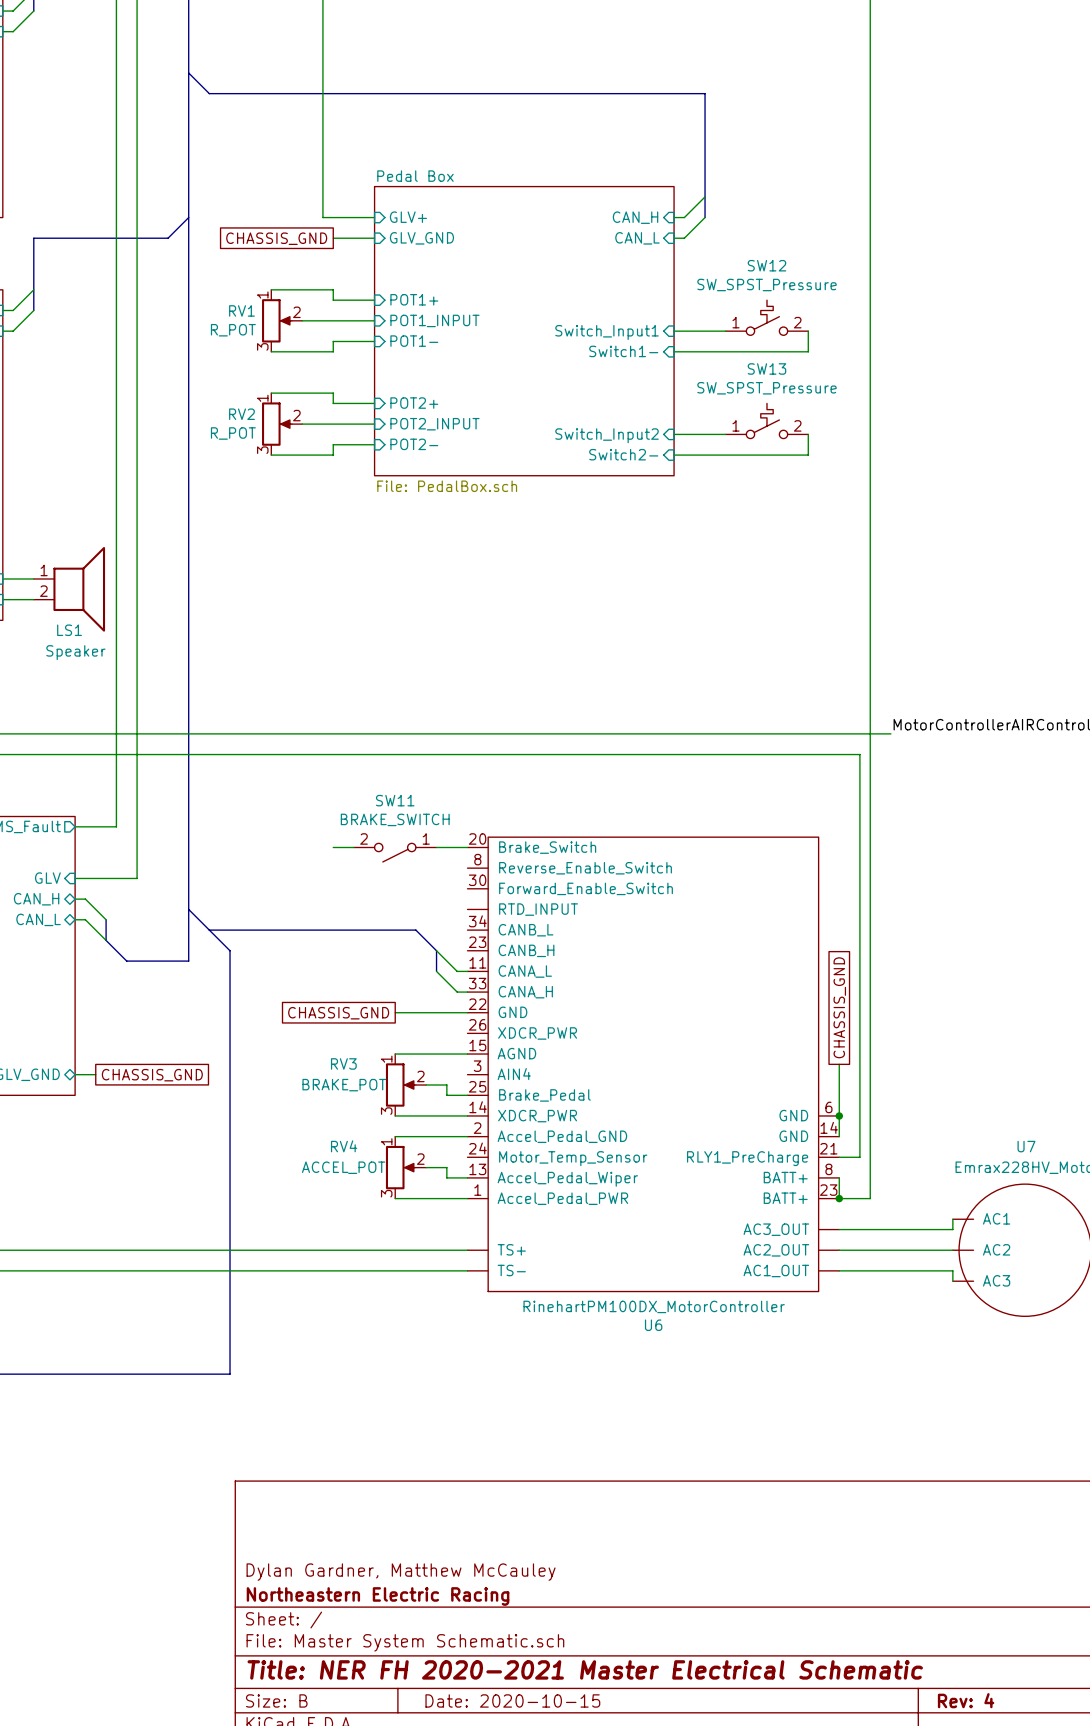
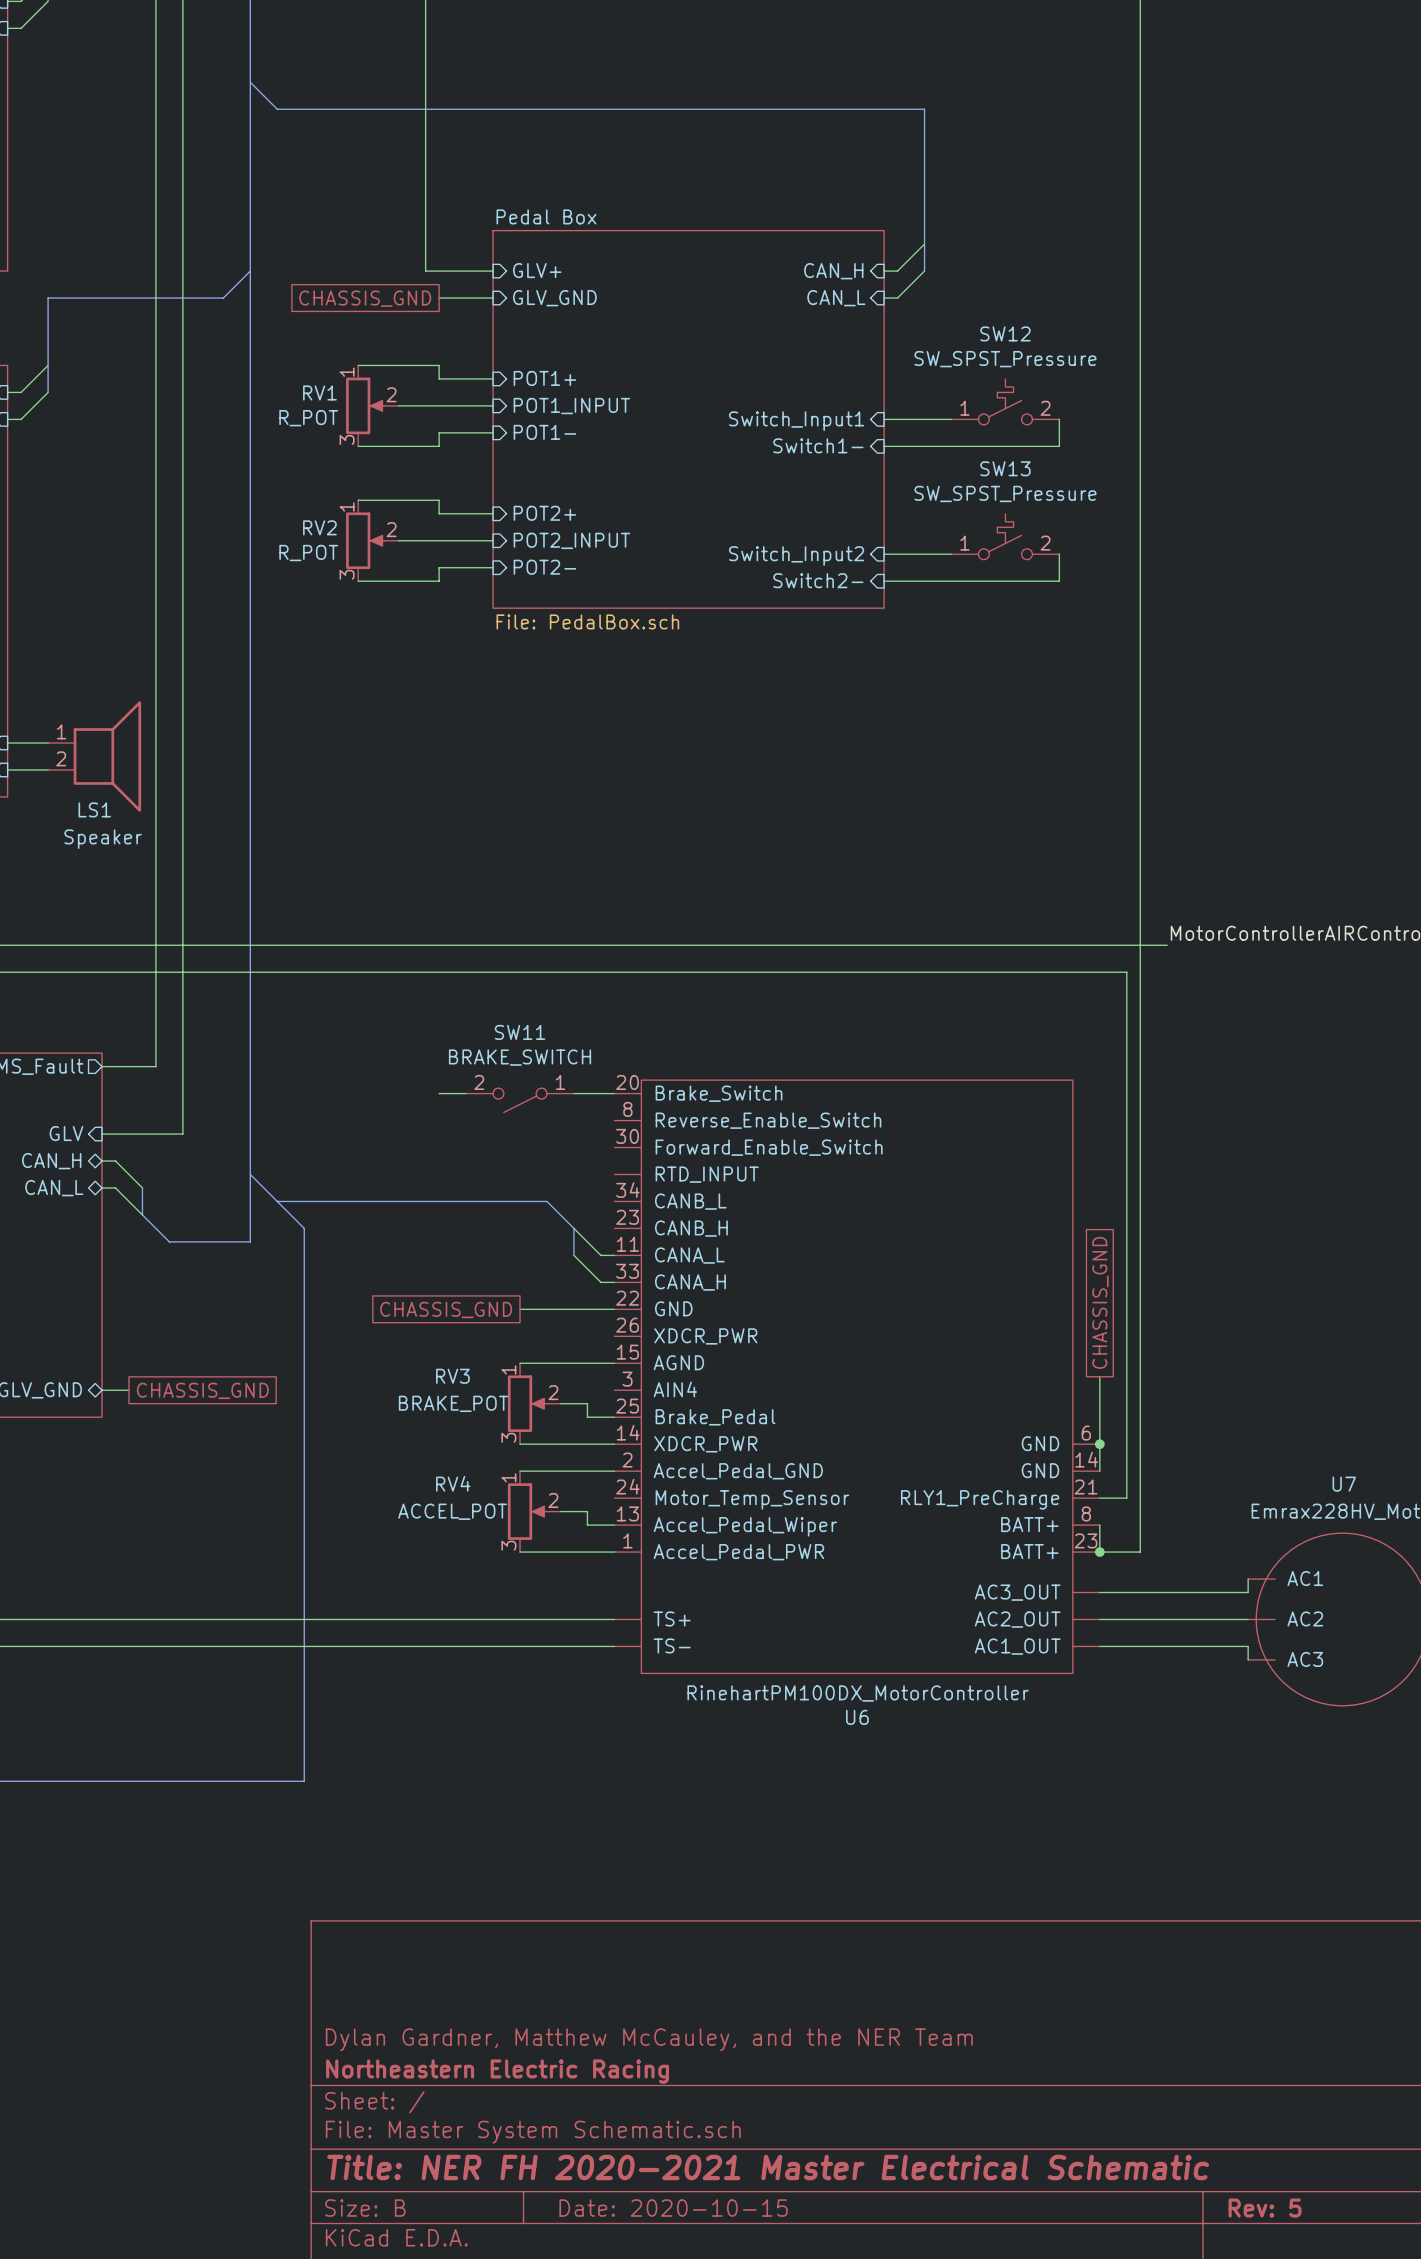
title block: Dylan Gardner, Matthew McCauley (401, 1572) -> Dylan Gardner, Matthew McCauley, and the NER Team (649, 2039)
title block: Rev: 4 (966, 1700) -> Rev: 5 (1265, 2208)

